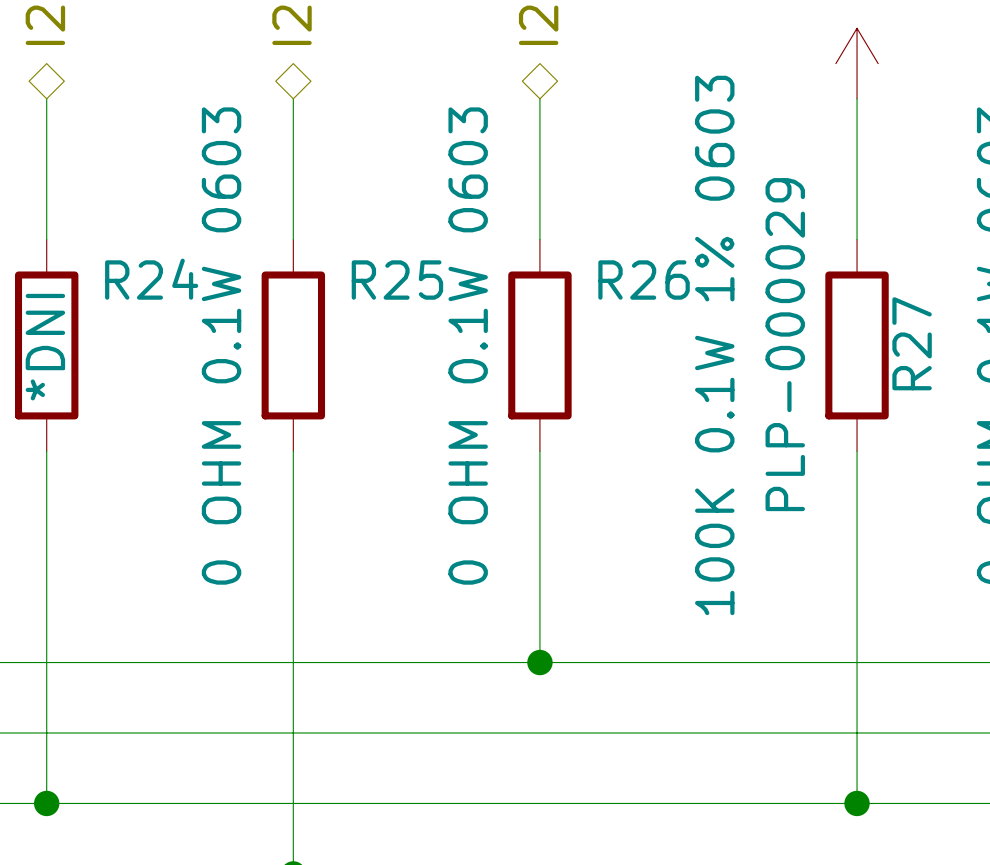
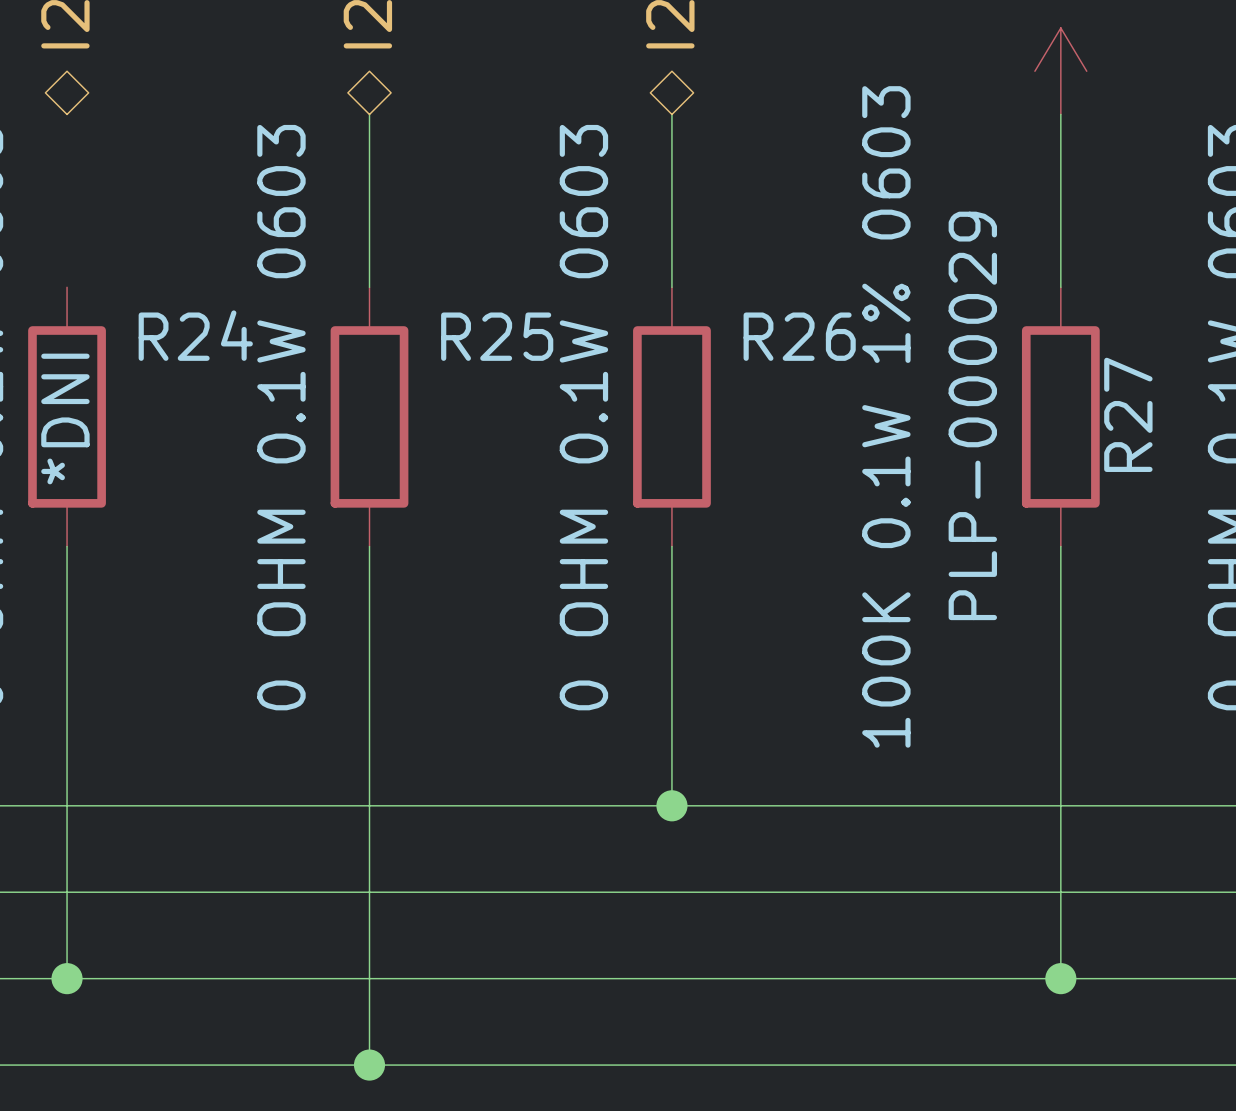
wire: (46, 98) (46, 239) -> none

